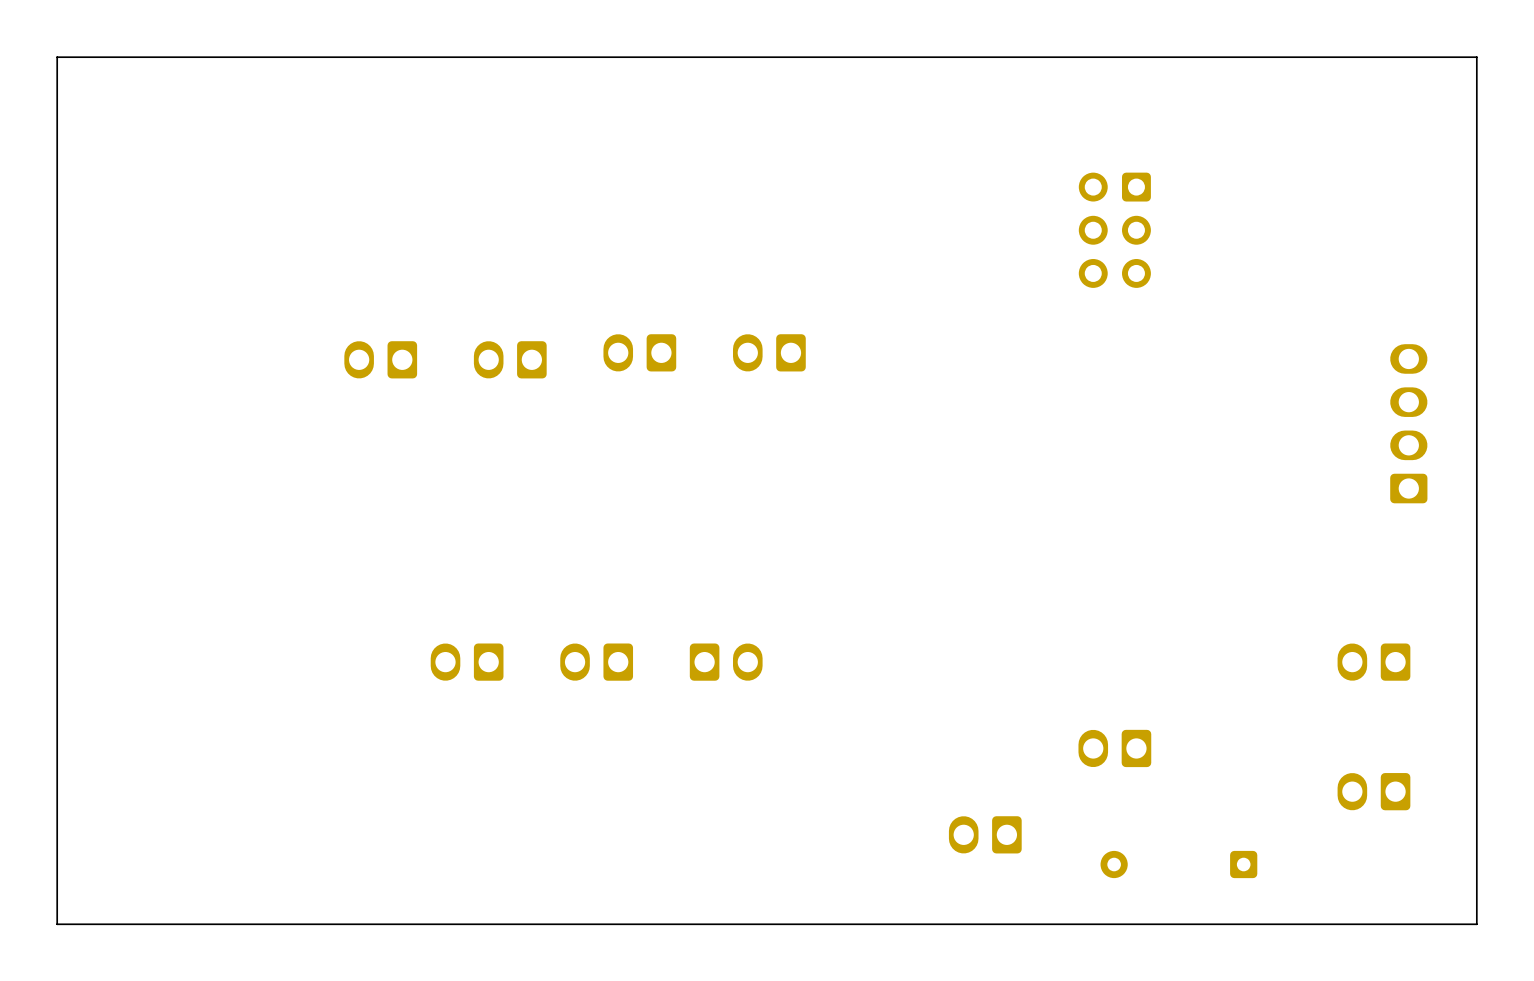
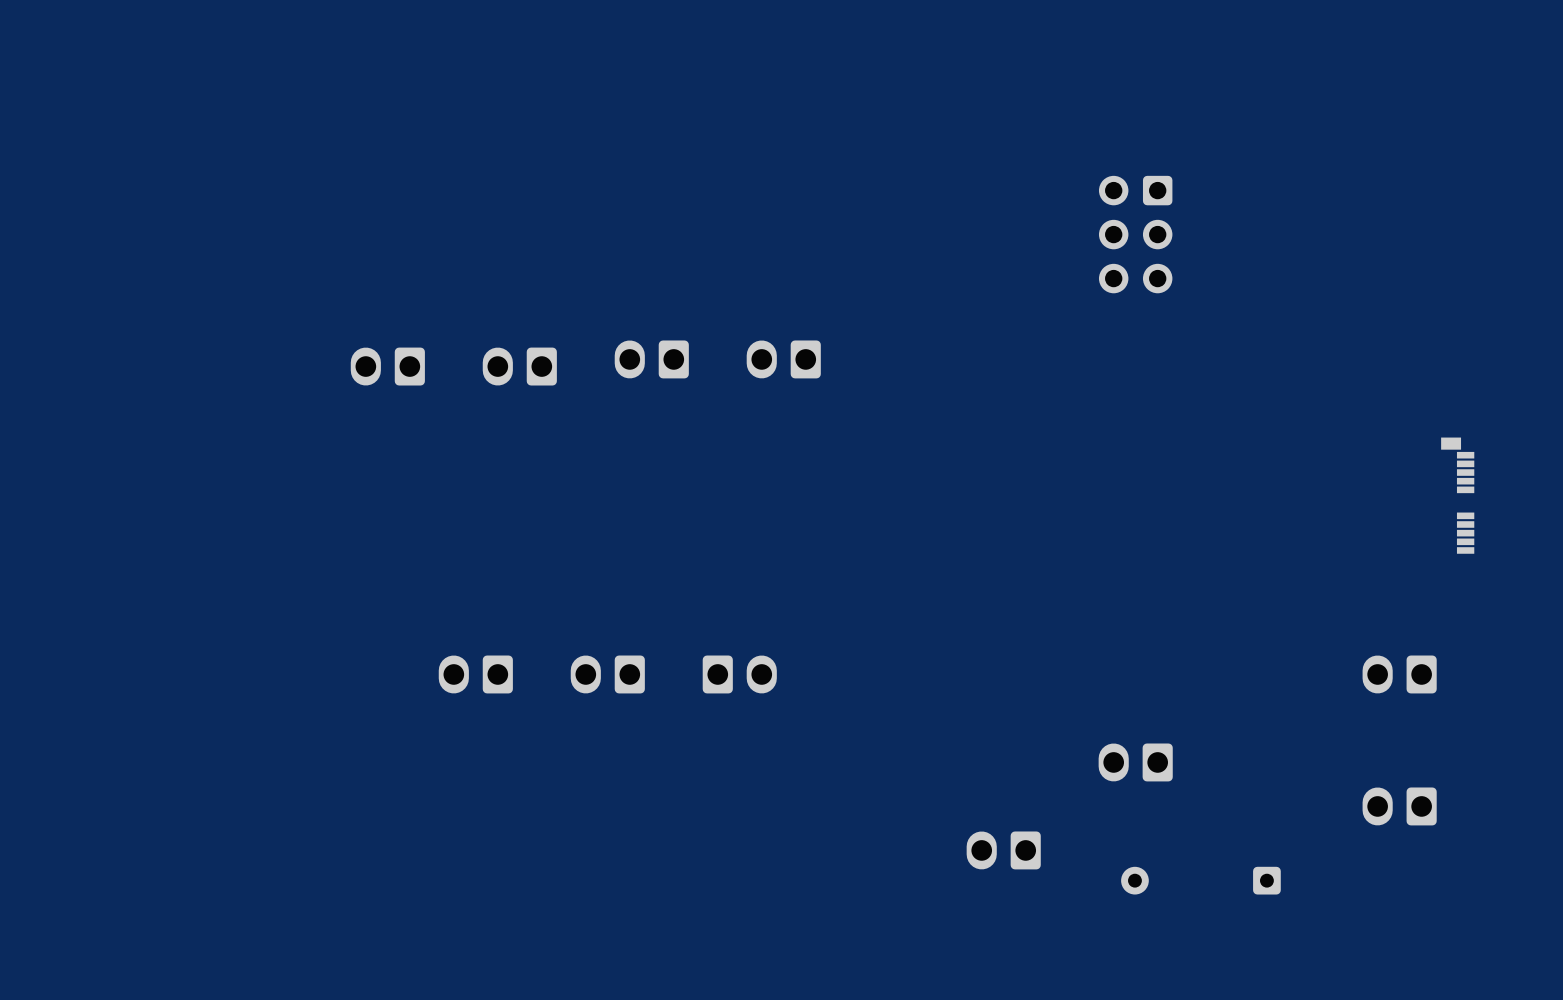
board edge: (1476, 57) (57, 57) (57, 924) (1476, 924) (1476, 57) -> none
part: (1408, 423) -> none
part: none -> (1457, 495)

